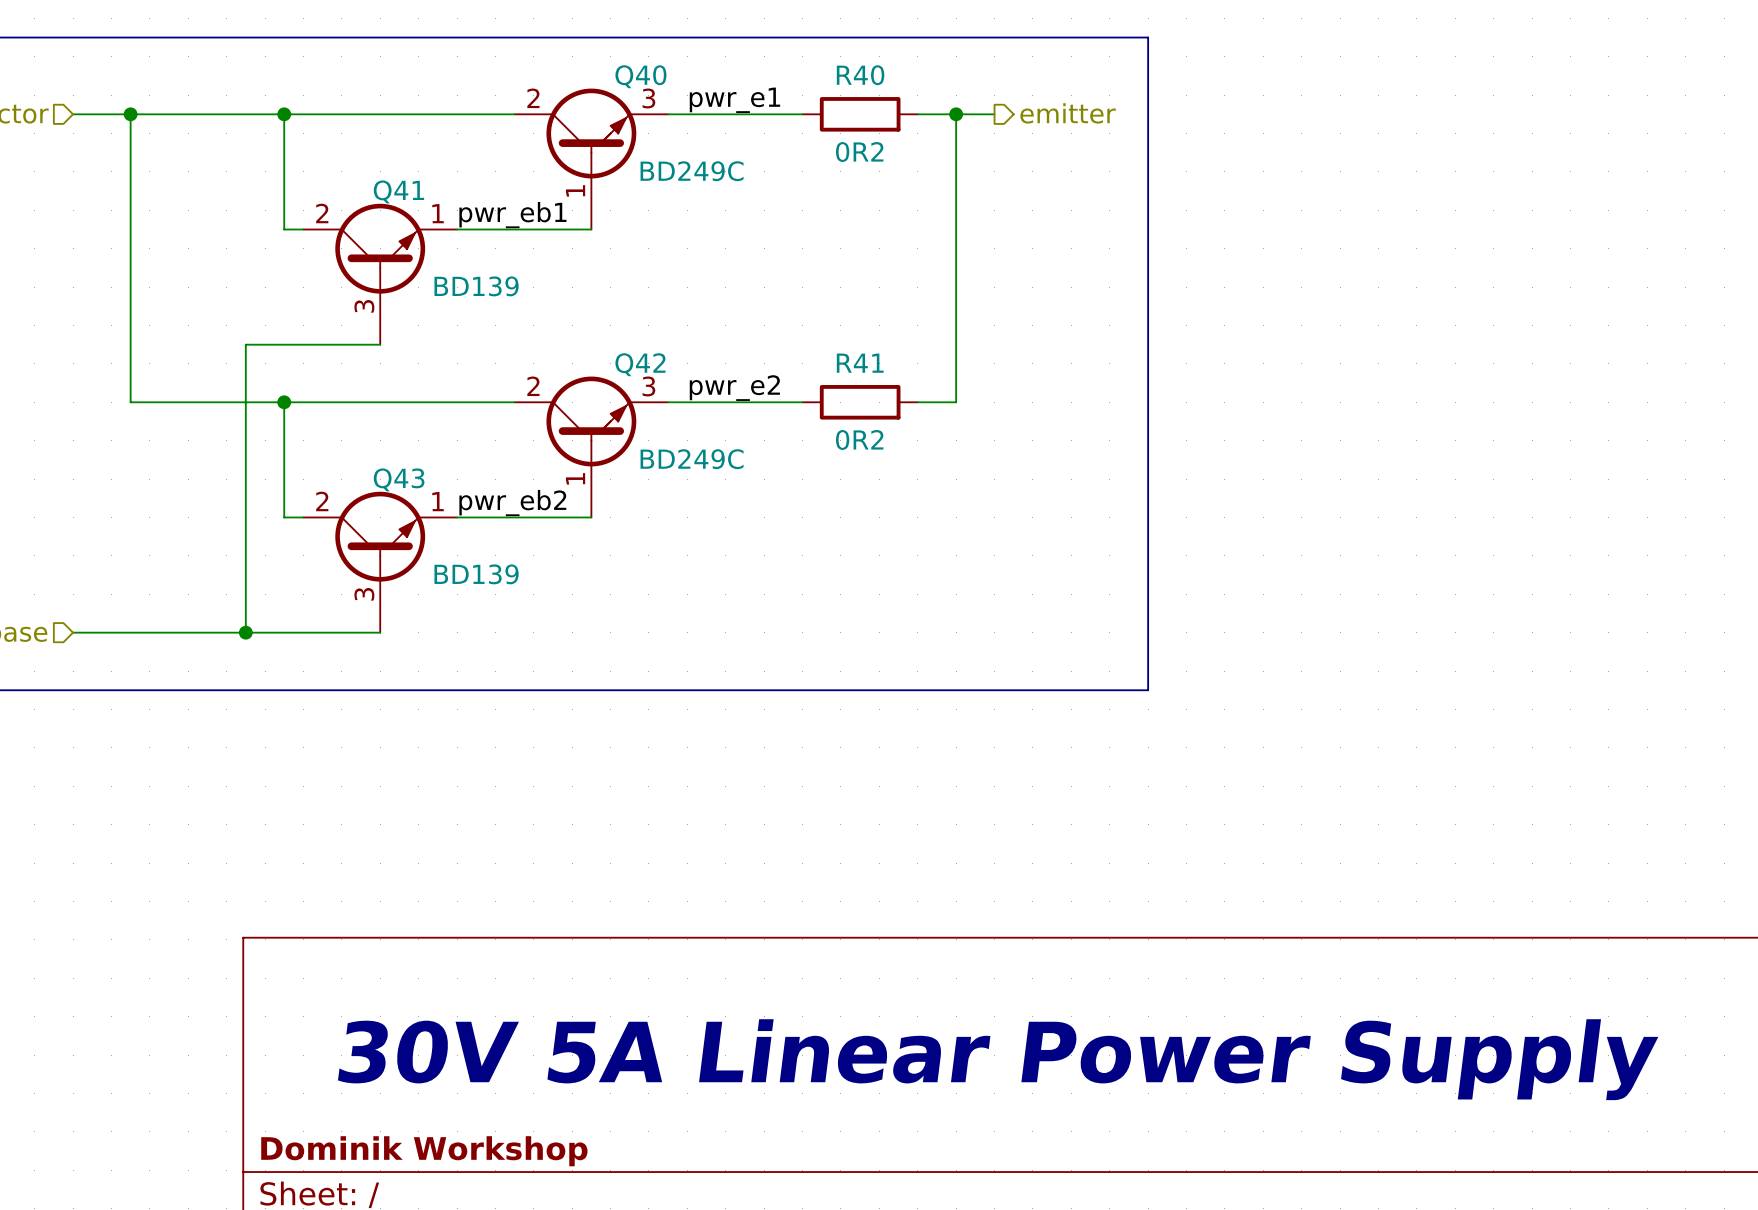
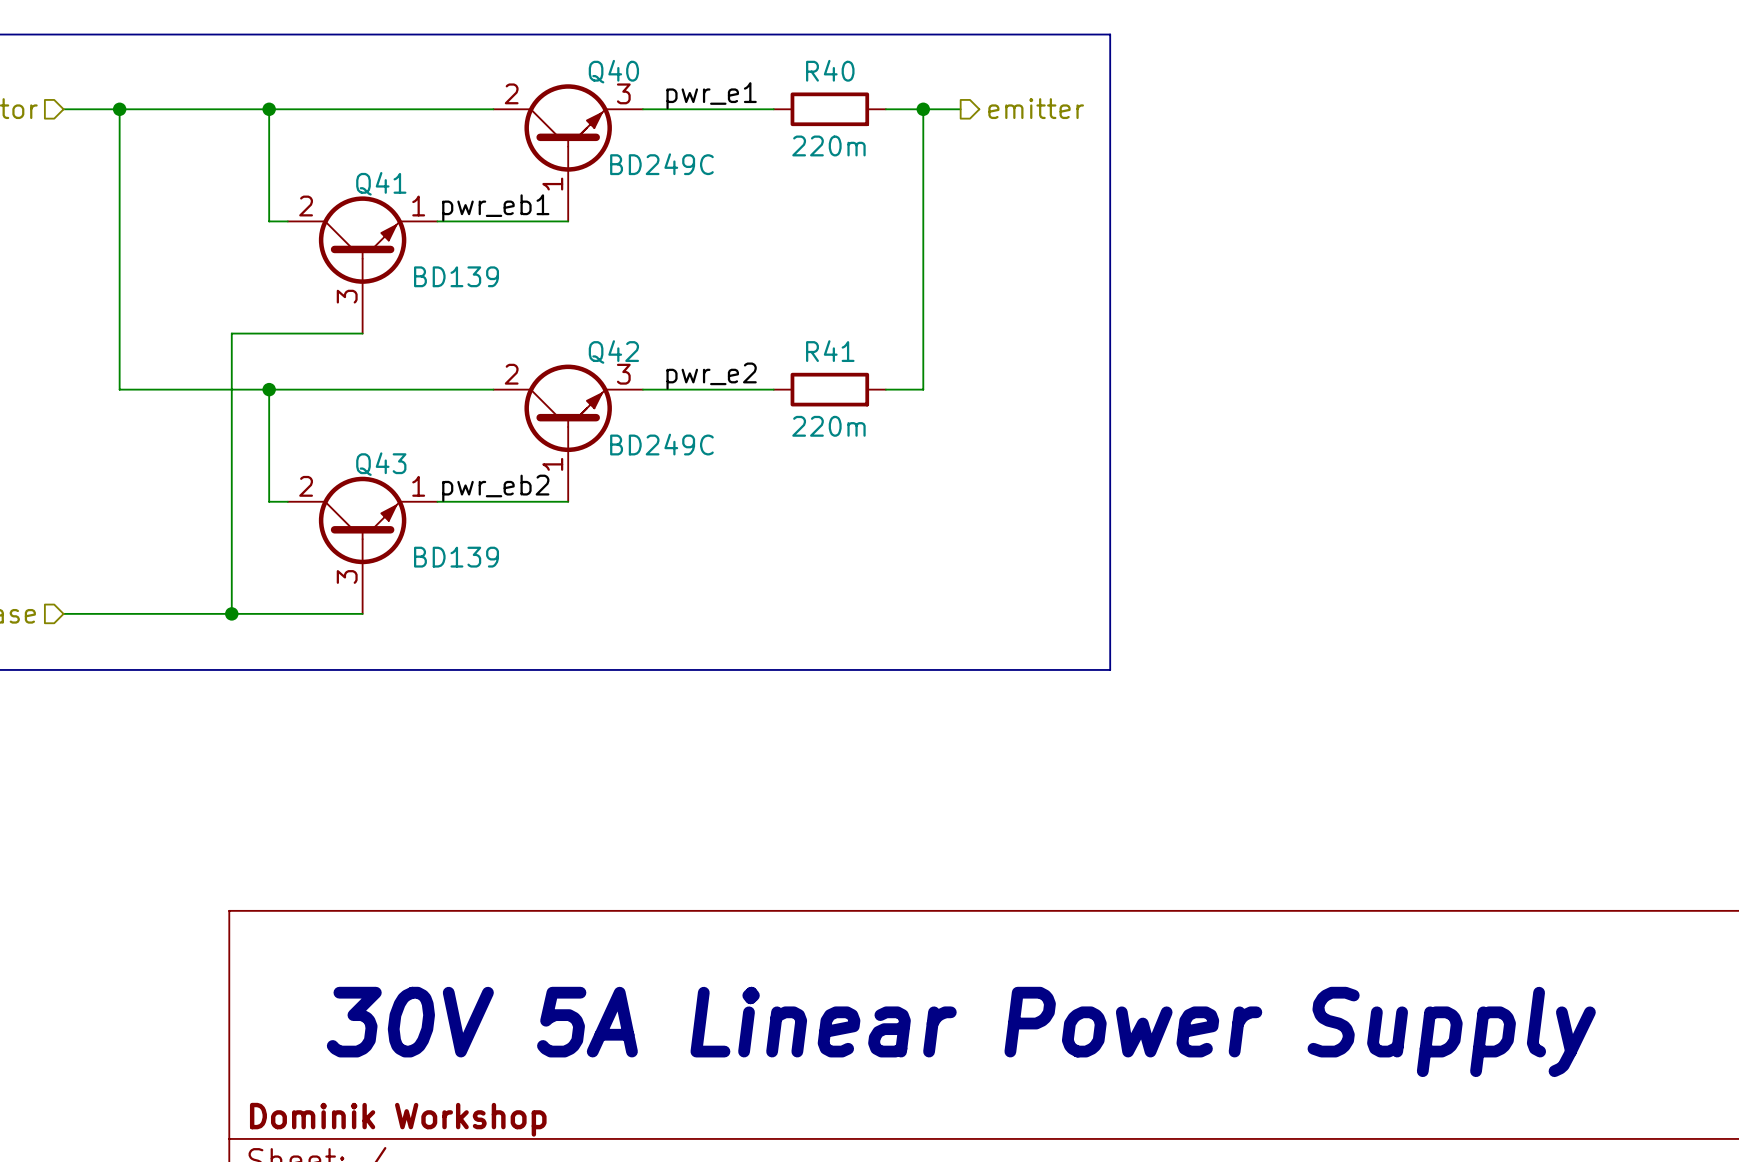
R40 value: 0R2 (859, 152) -> 220m (828, 145)
R41 value: 0R2 (859, 439) -> 220m (828, 426)

